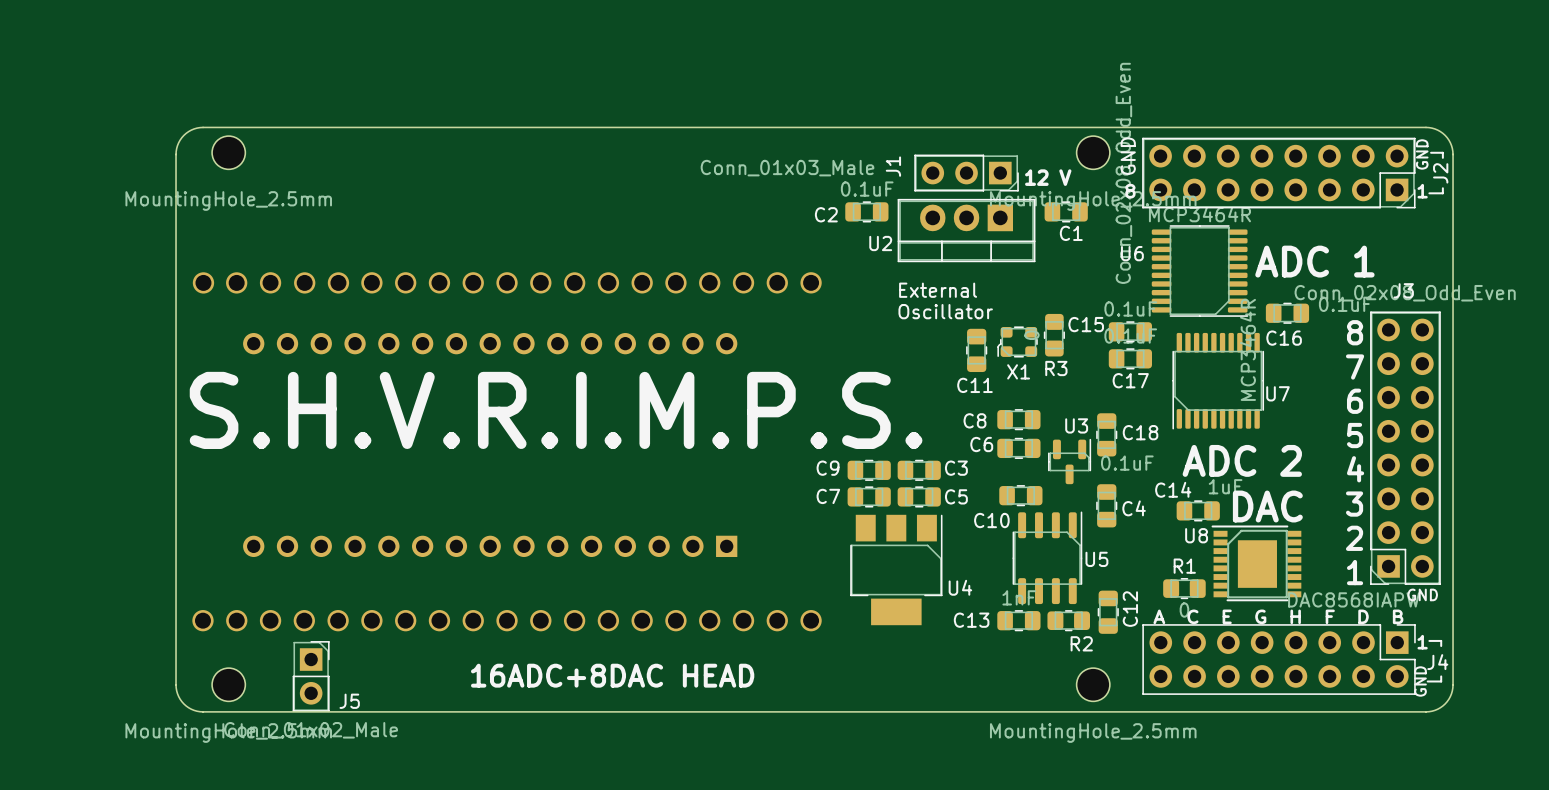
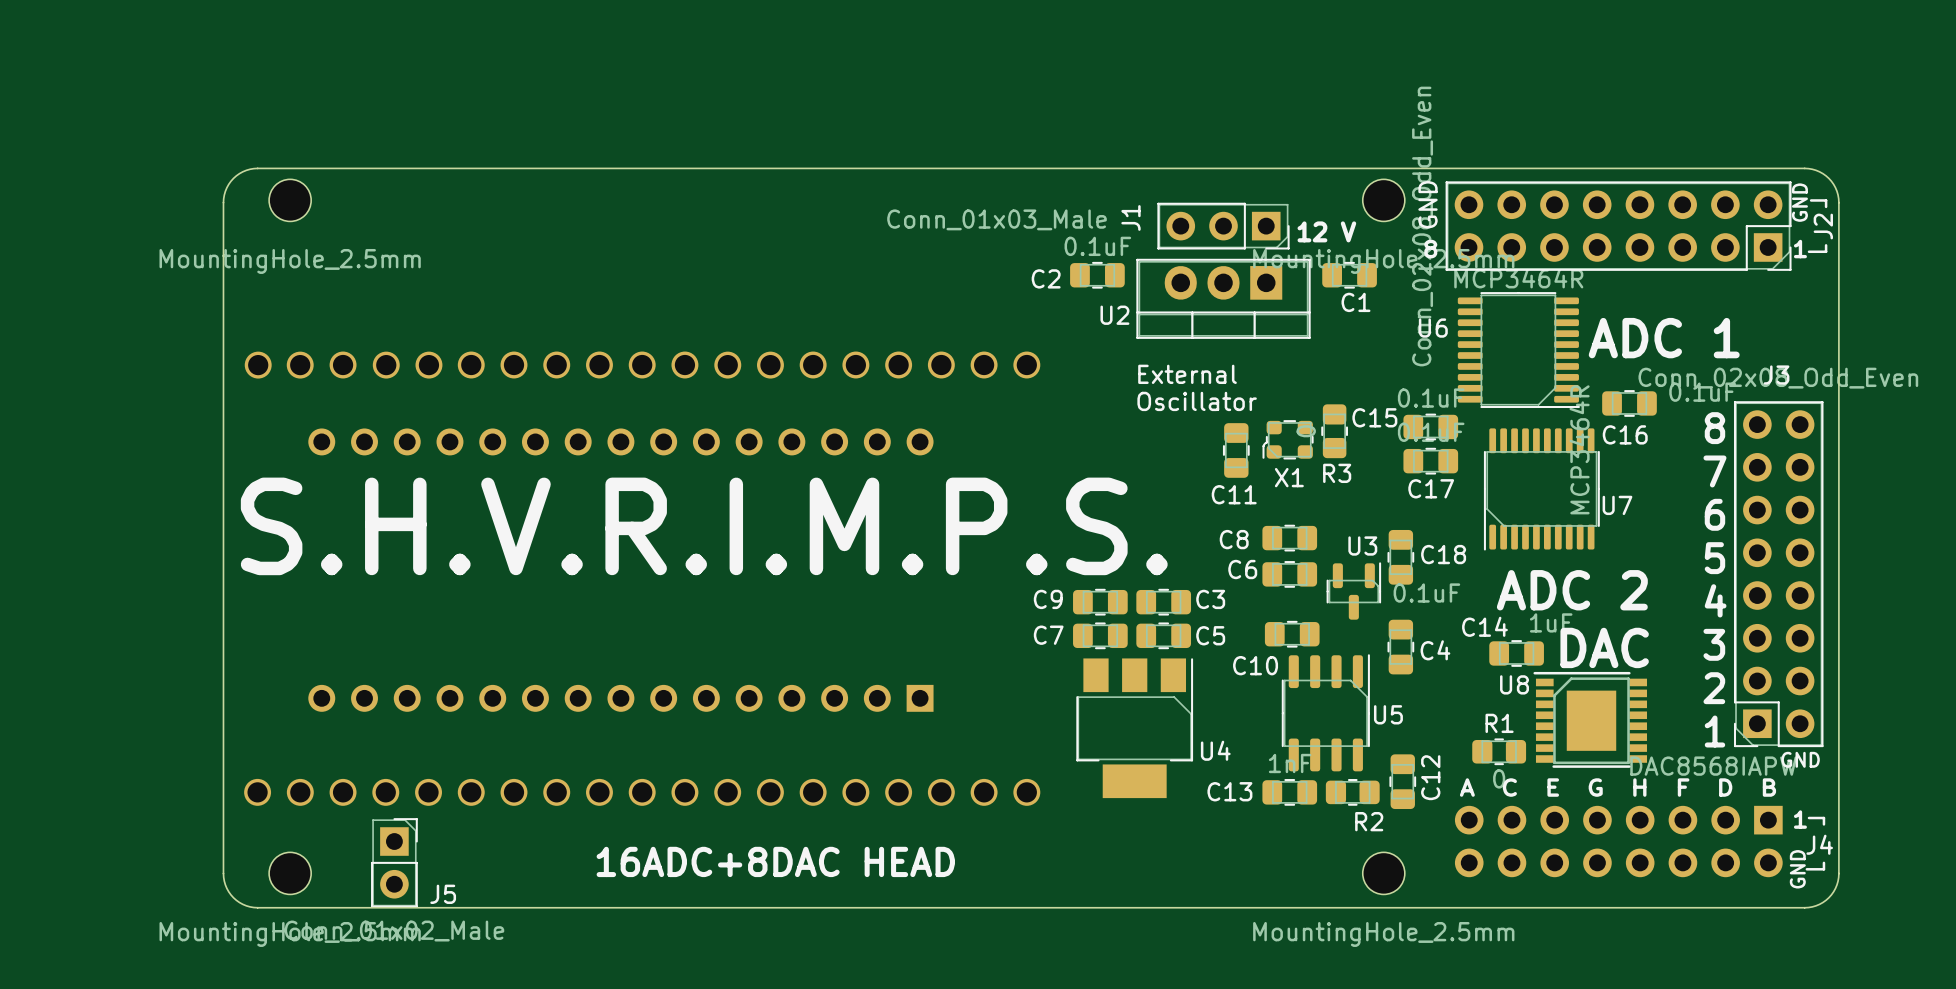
J4 footprint: [1142, 624, 1416, 695] -> [1454, 805, 1783, 878]

